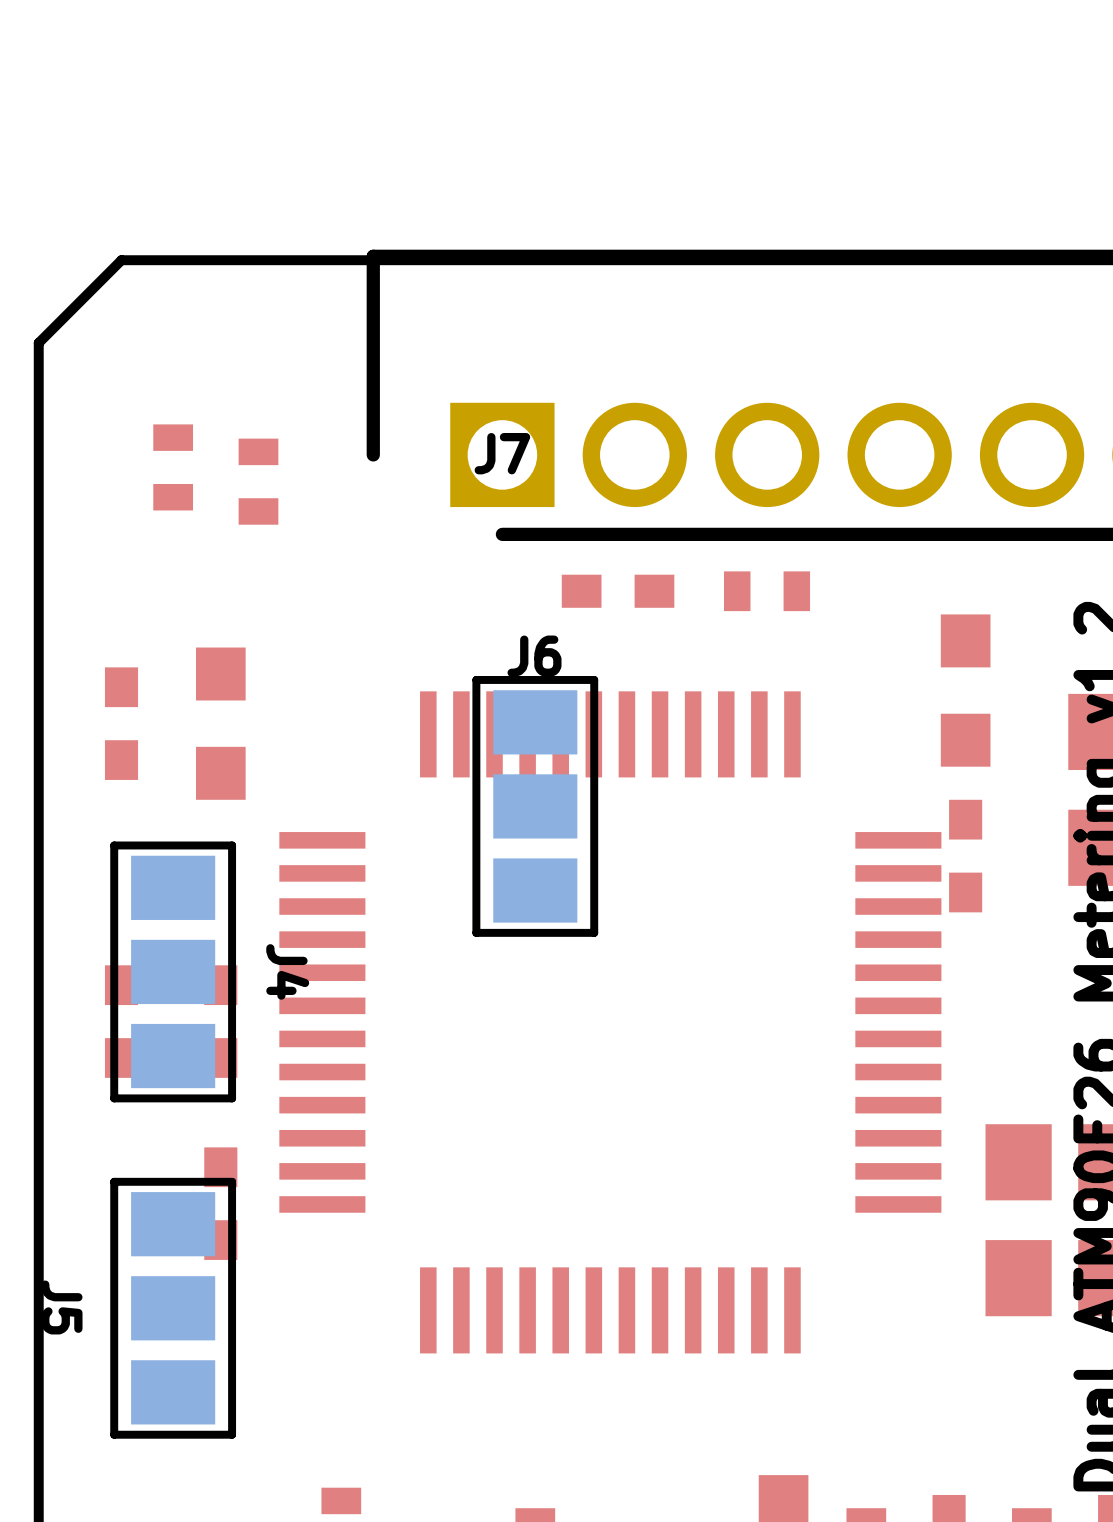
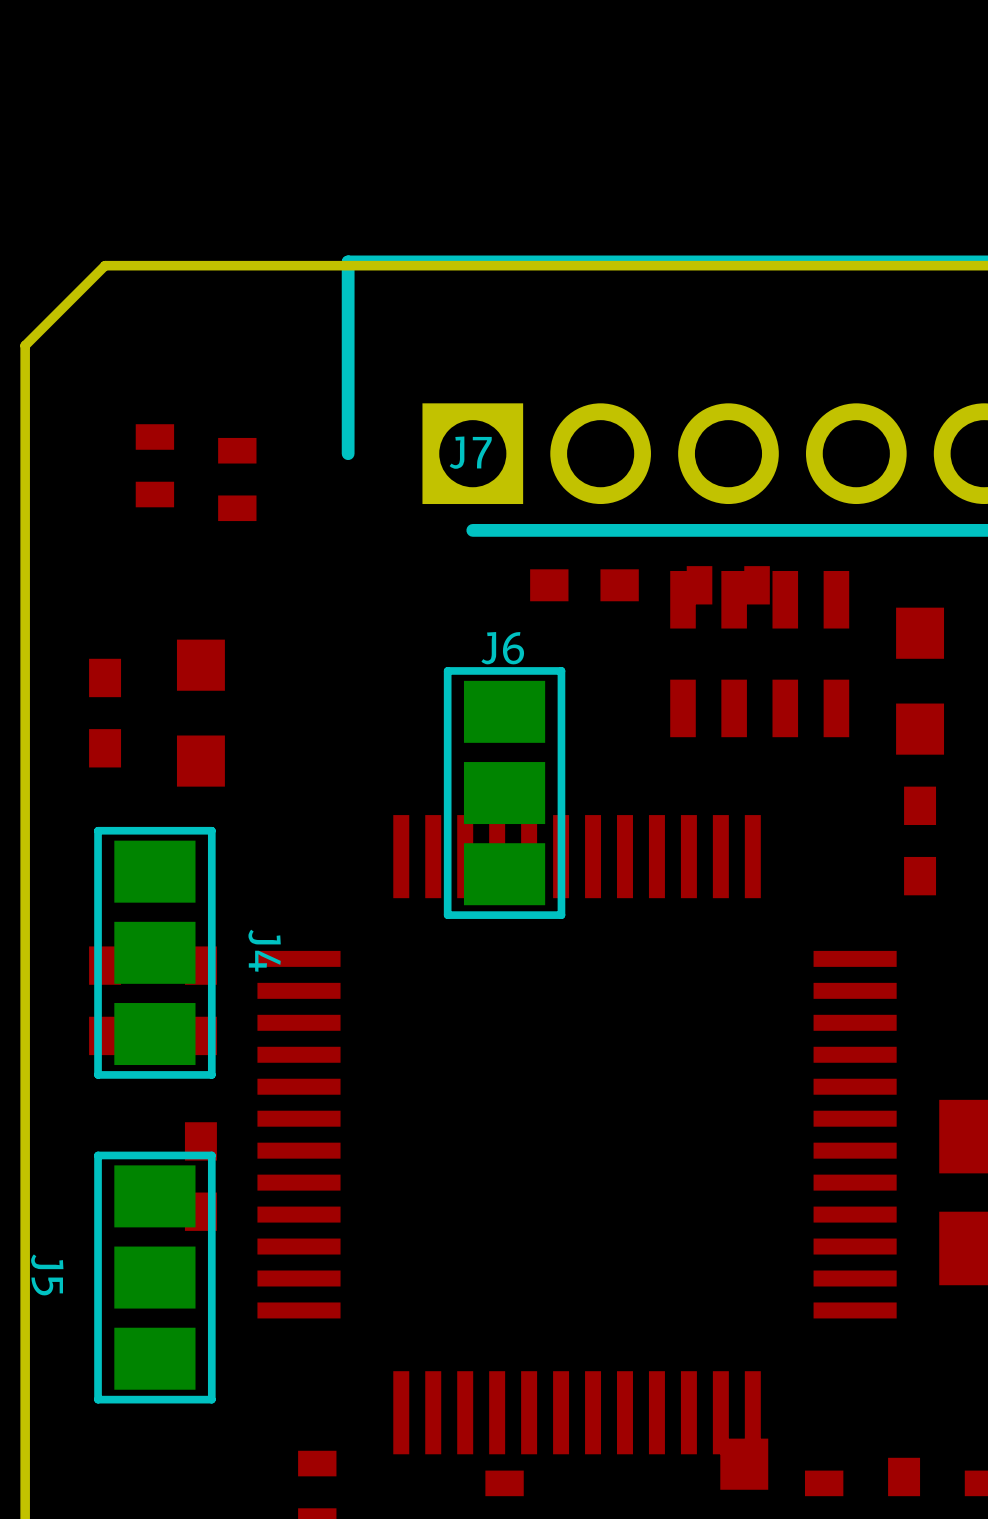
part: none -> (759, 654)
part position: (610, 1022) -> (577, 1134)

